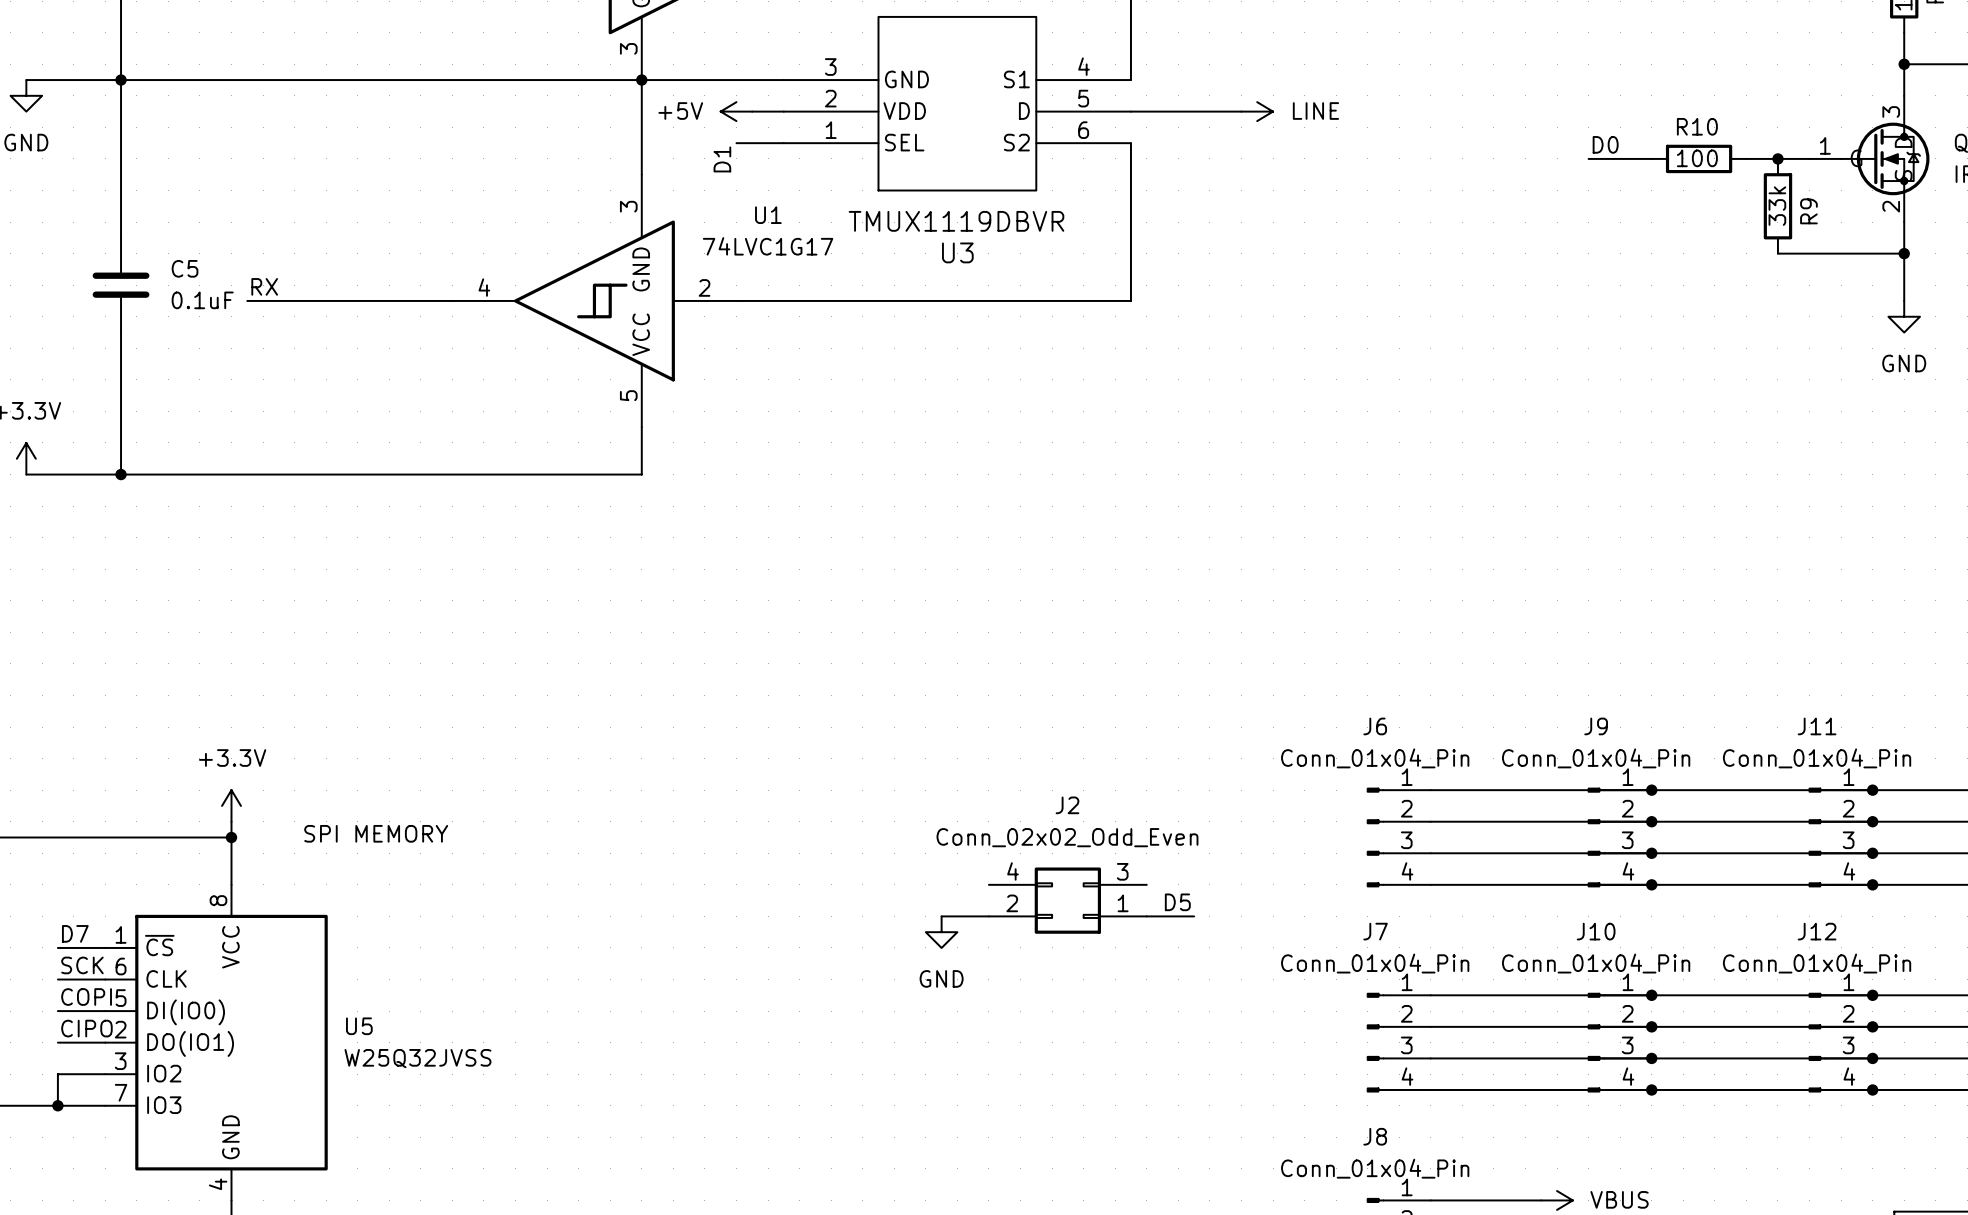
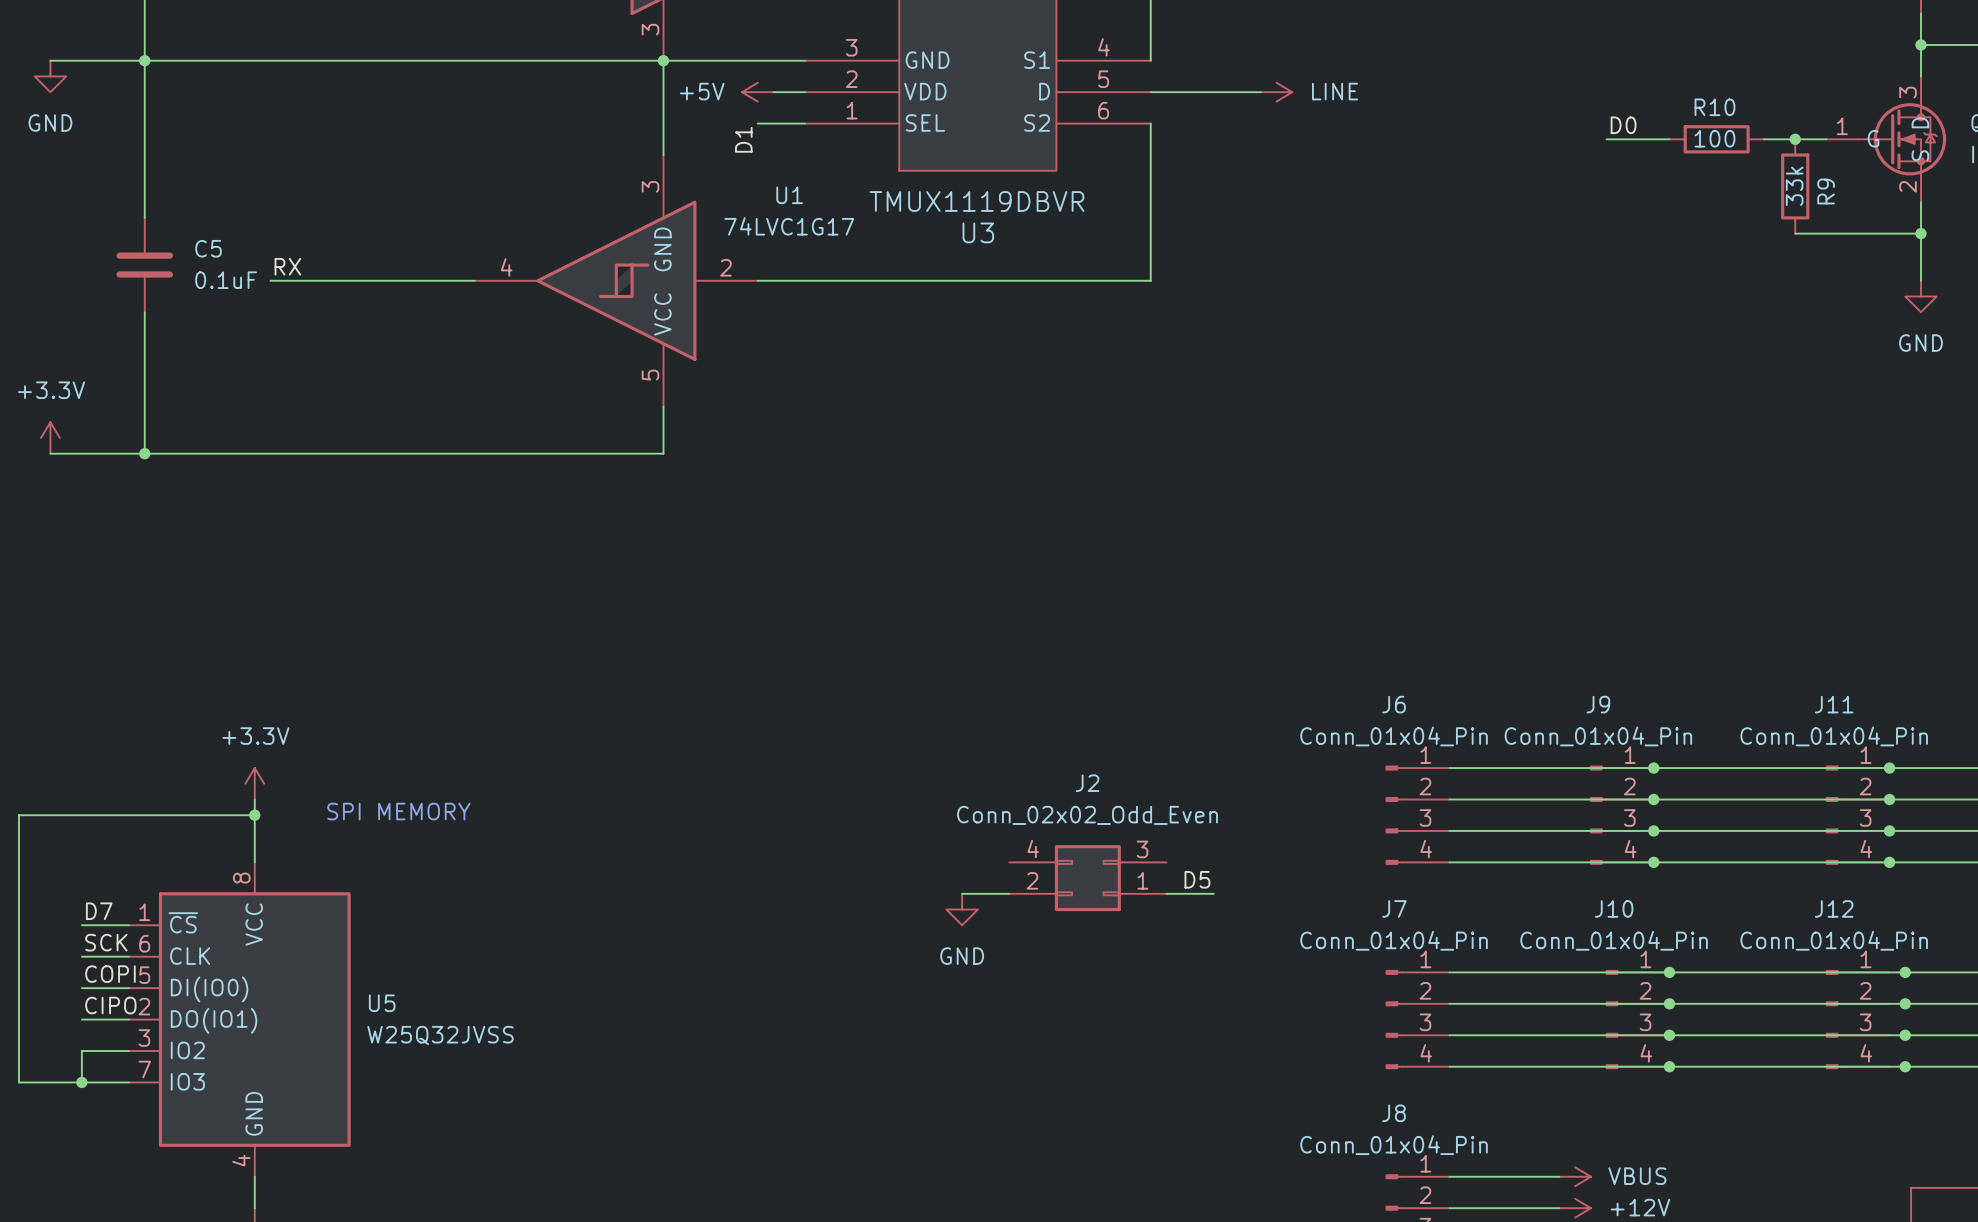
junction position: (1651, 790) -> (1653, 768)
junction position: (1651, 821) -> (1653, 799)
J9 position: (1619, 837) -> (1621, 815)
junction position: (1651, 853) -> (1653, 830)
junction position: (1651, 884) -> (1653, 862)
junction position: (1872, 995) -> (1905, 972)
junction position: (1872, 1026) -> (1905, 1003)
junction position: (1872, 1058) -> (1905, 1035)
junction position: (1872, 1089) -> (1905, 1066)

